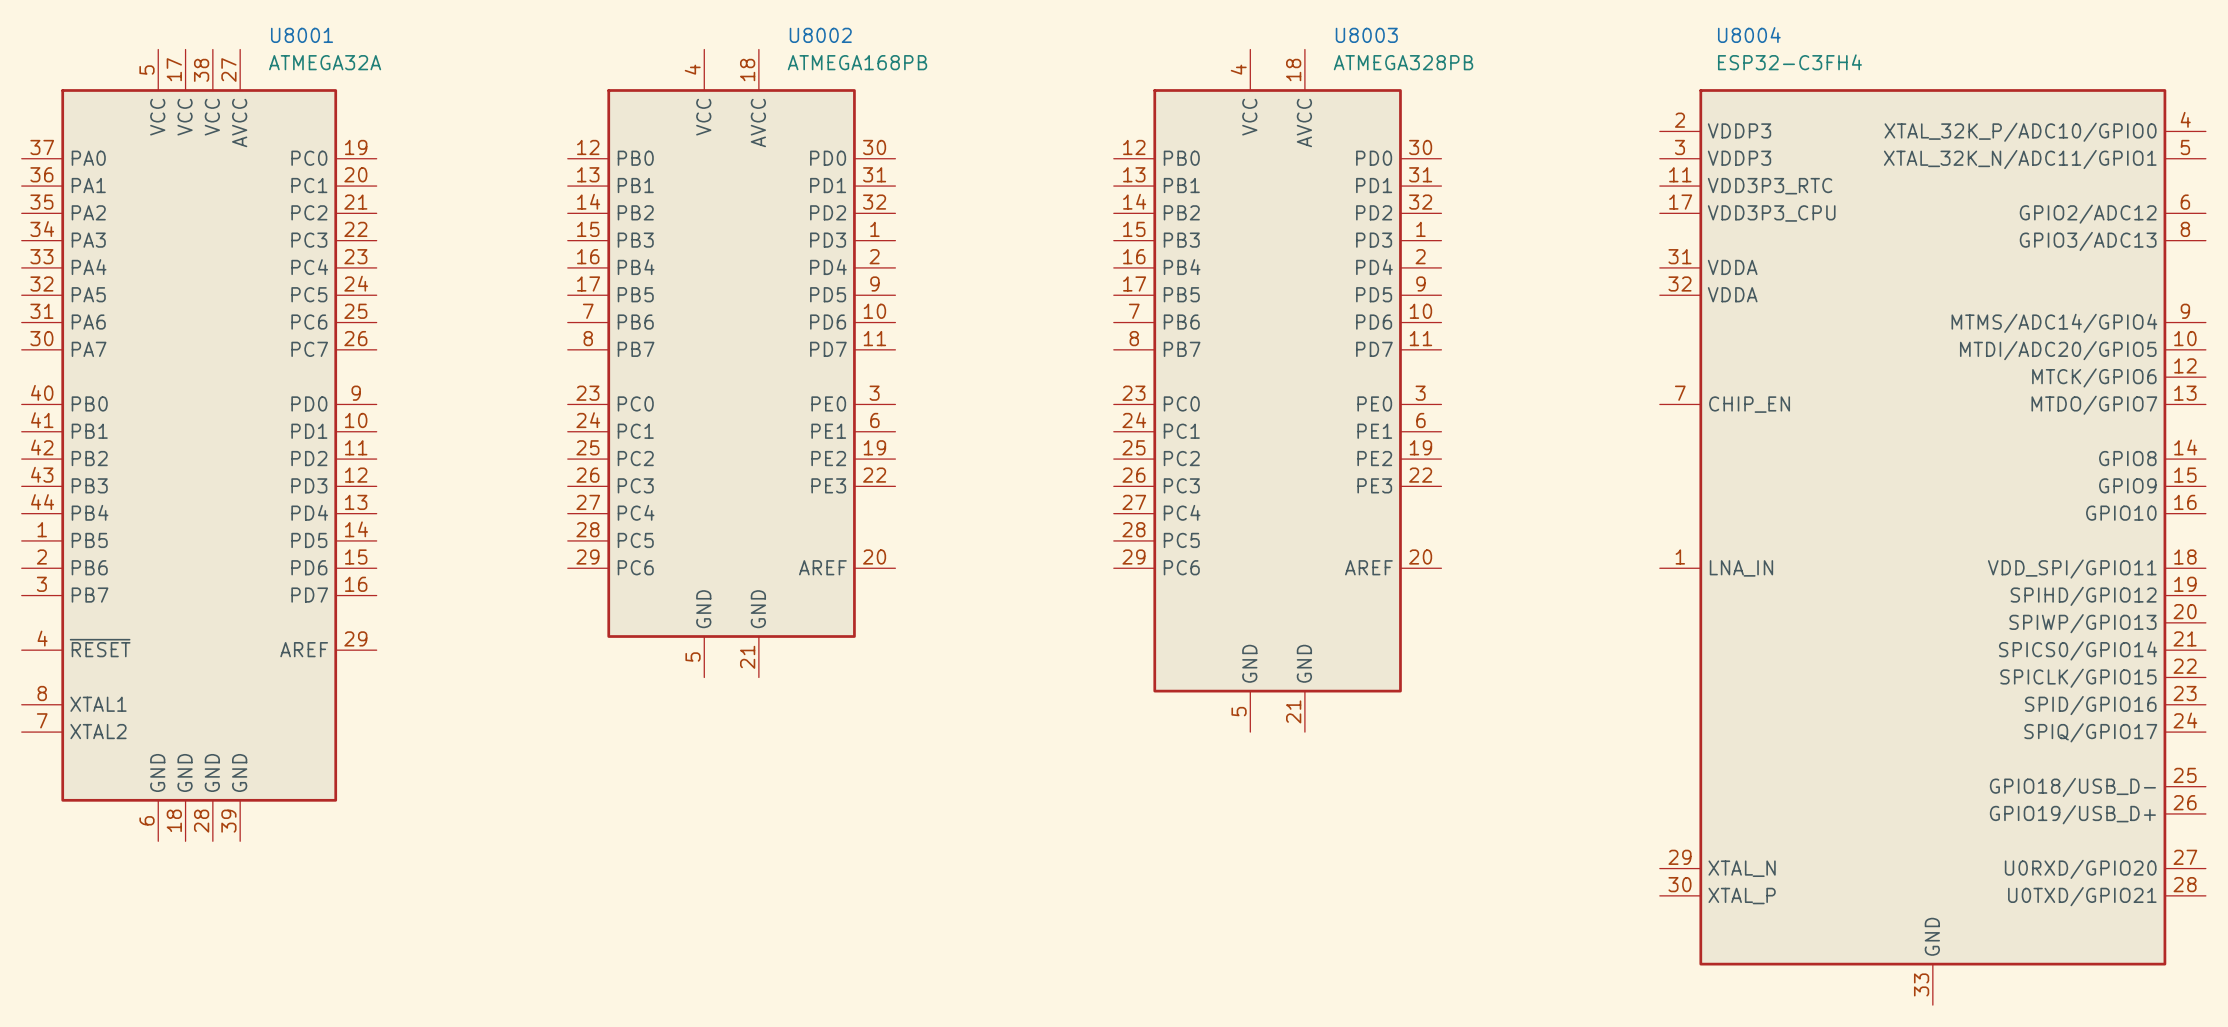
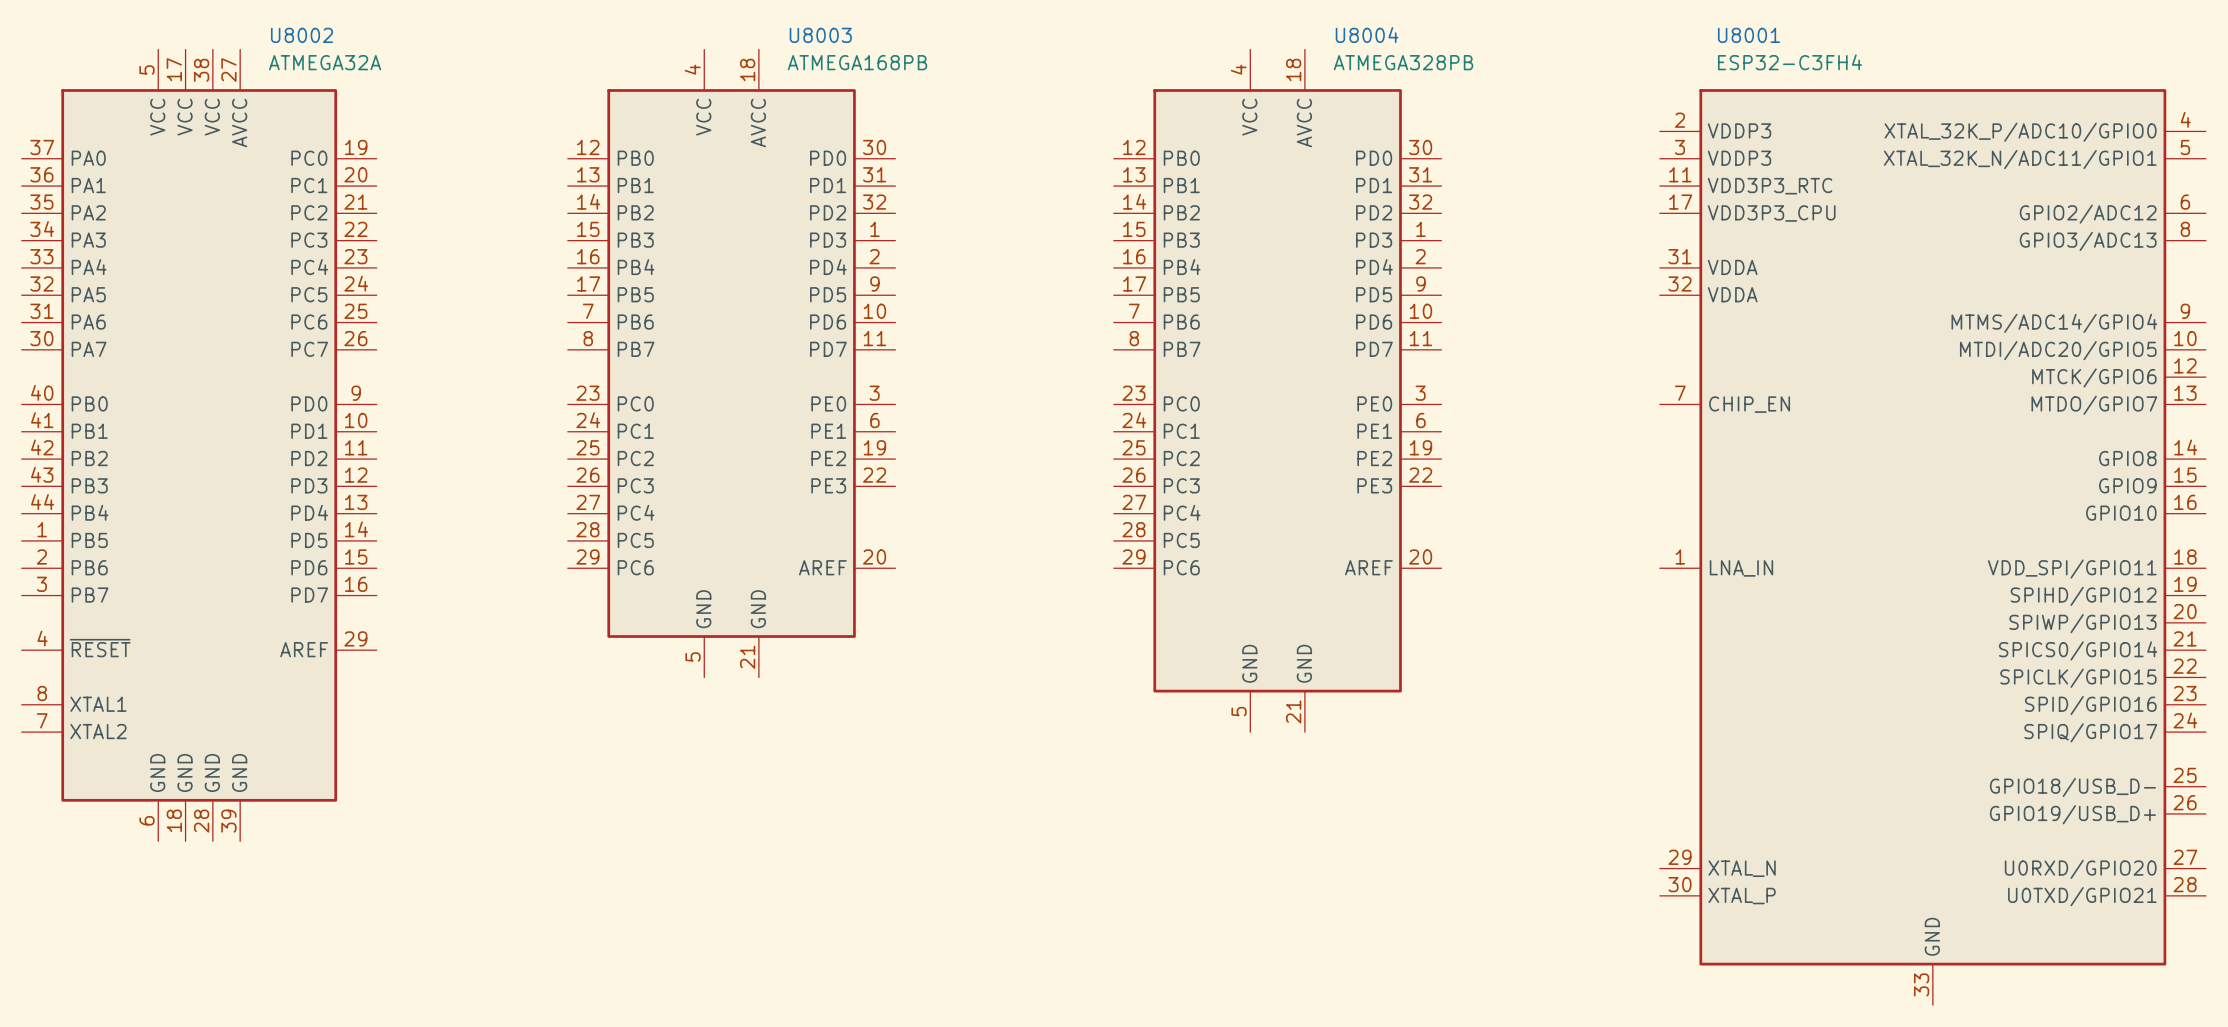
U8001 name: U8001 (302, 35) -> U8002 (302, 35)
U8002 name: U8002 (820, 35) -> U8003 (820, 35)
U8003 name: U8003 (1366, 35) -> U8004 (1367, 35)
U8004 name: U8004 (1749, 35) -> U8001 (1748, 35)

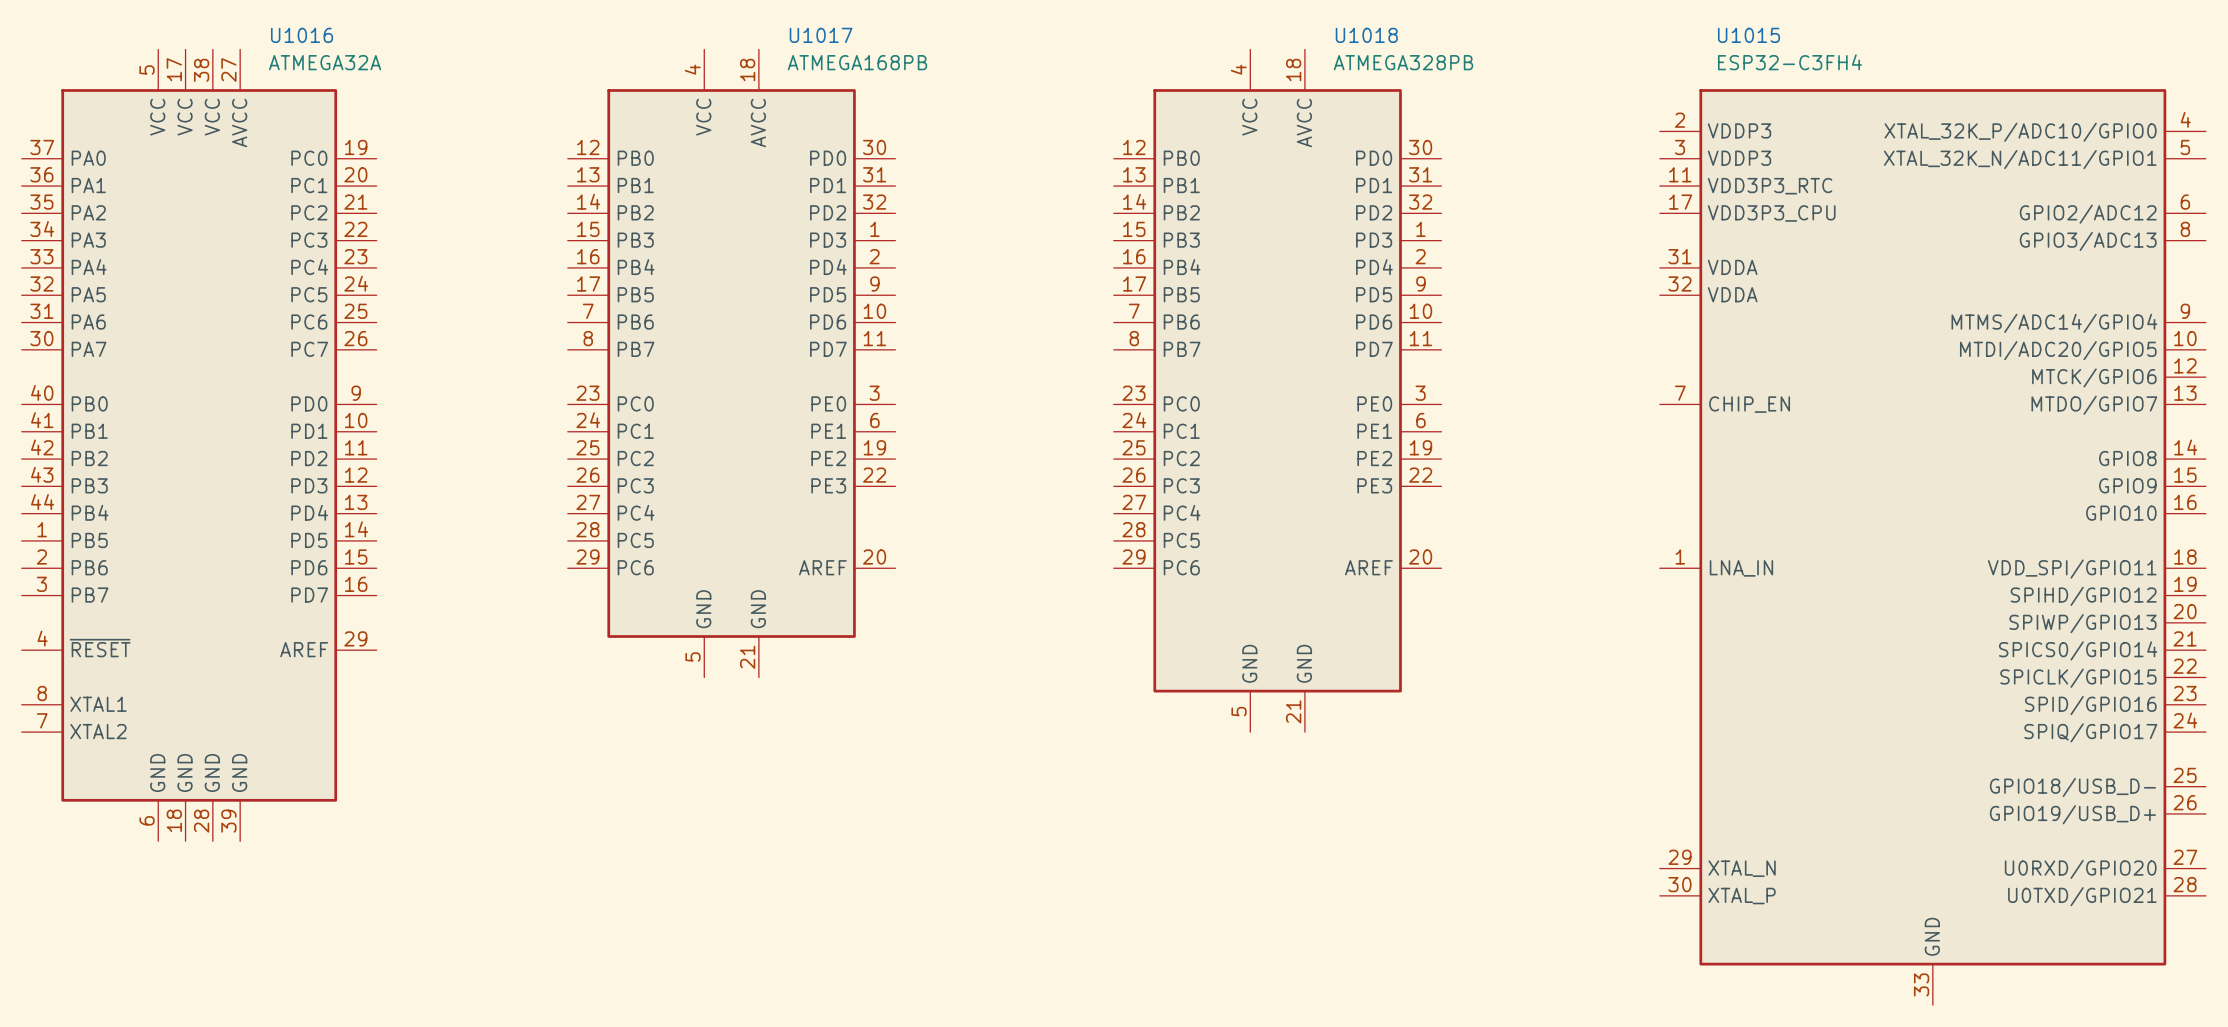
U8002 name: U8002 (302, 35) -> U1016 (302, 35)
U8003 name: U8003 (820, 35) -> U1017 (821, 35)
U8004 name: U8004 (1367, 35) -> U1018 (1366, 35)
U8001 name: U8001 (1748, 35) -> U1015 (1748, 35)

